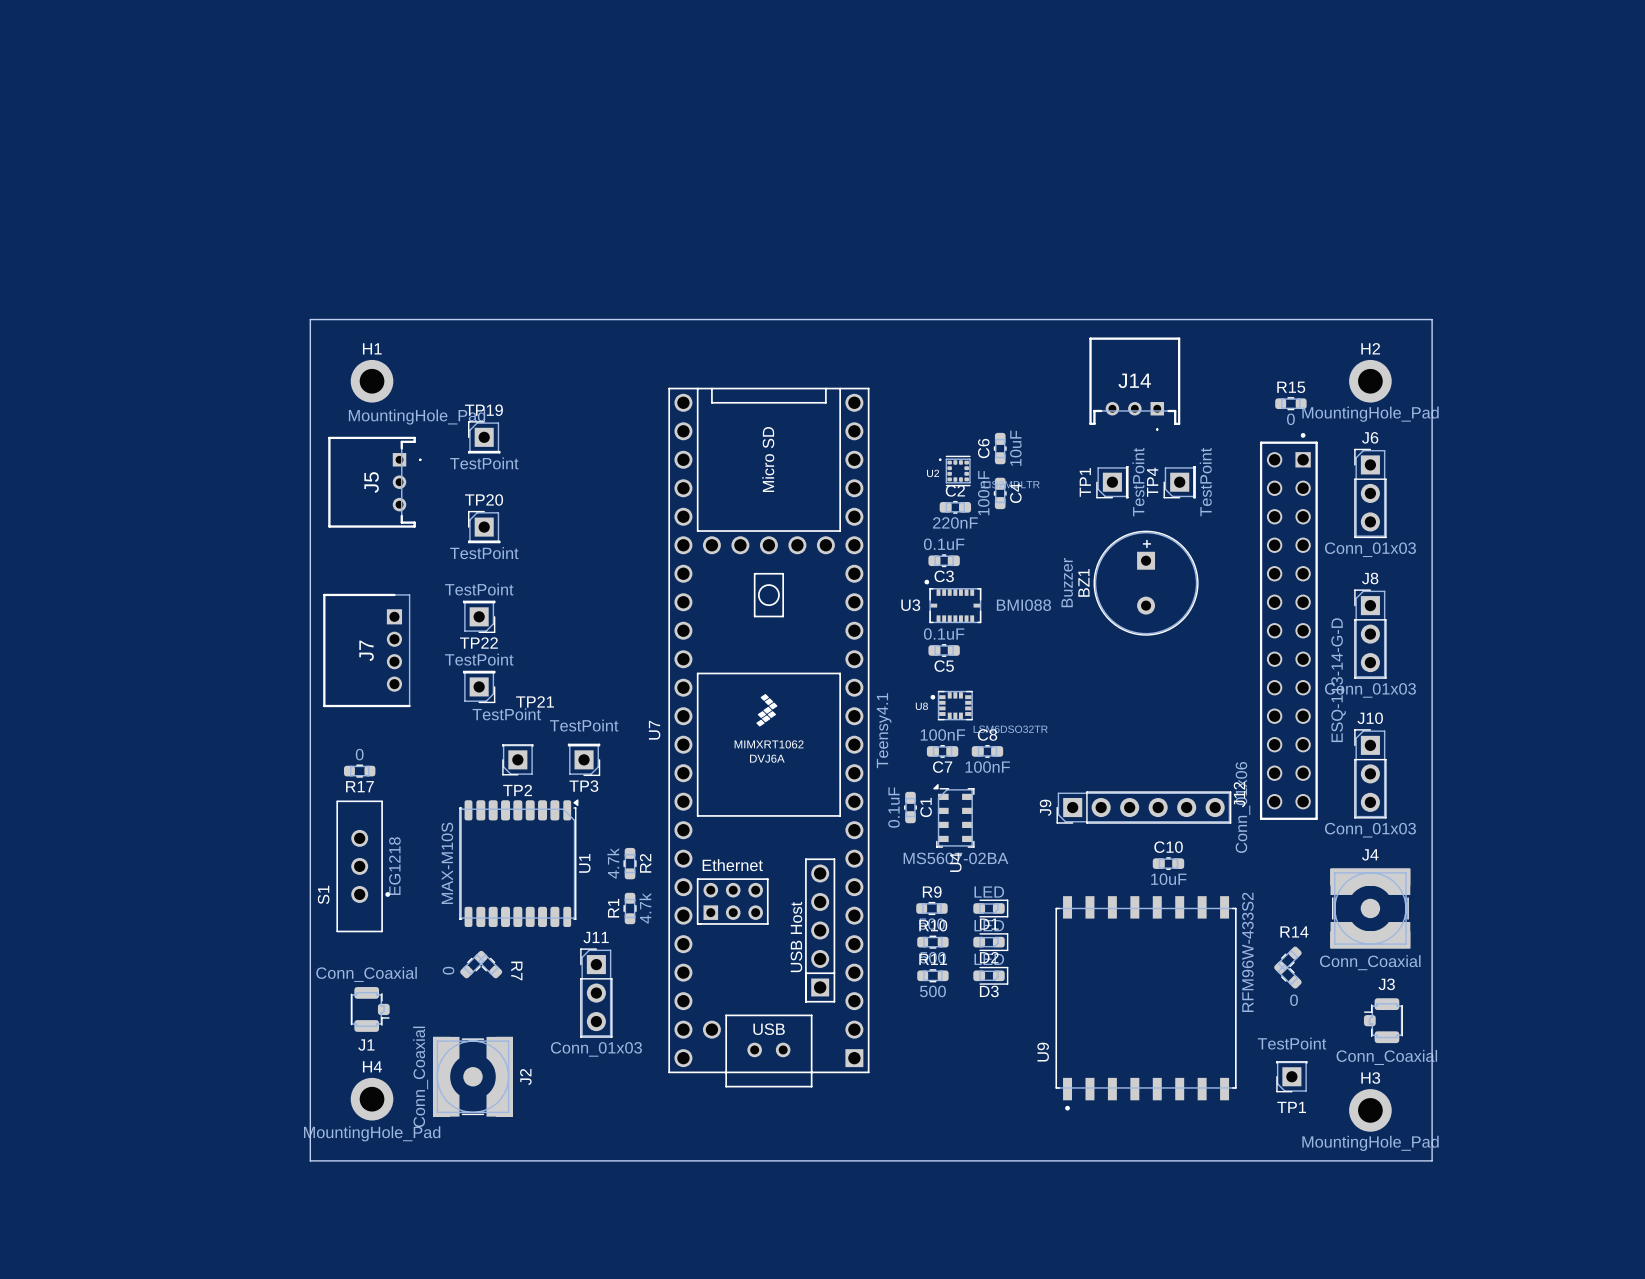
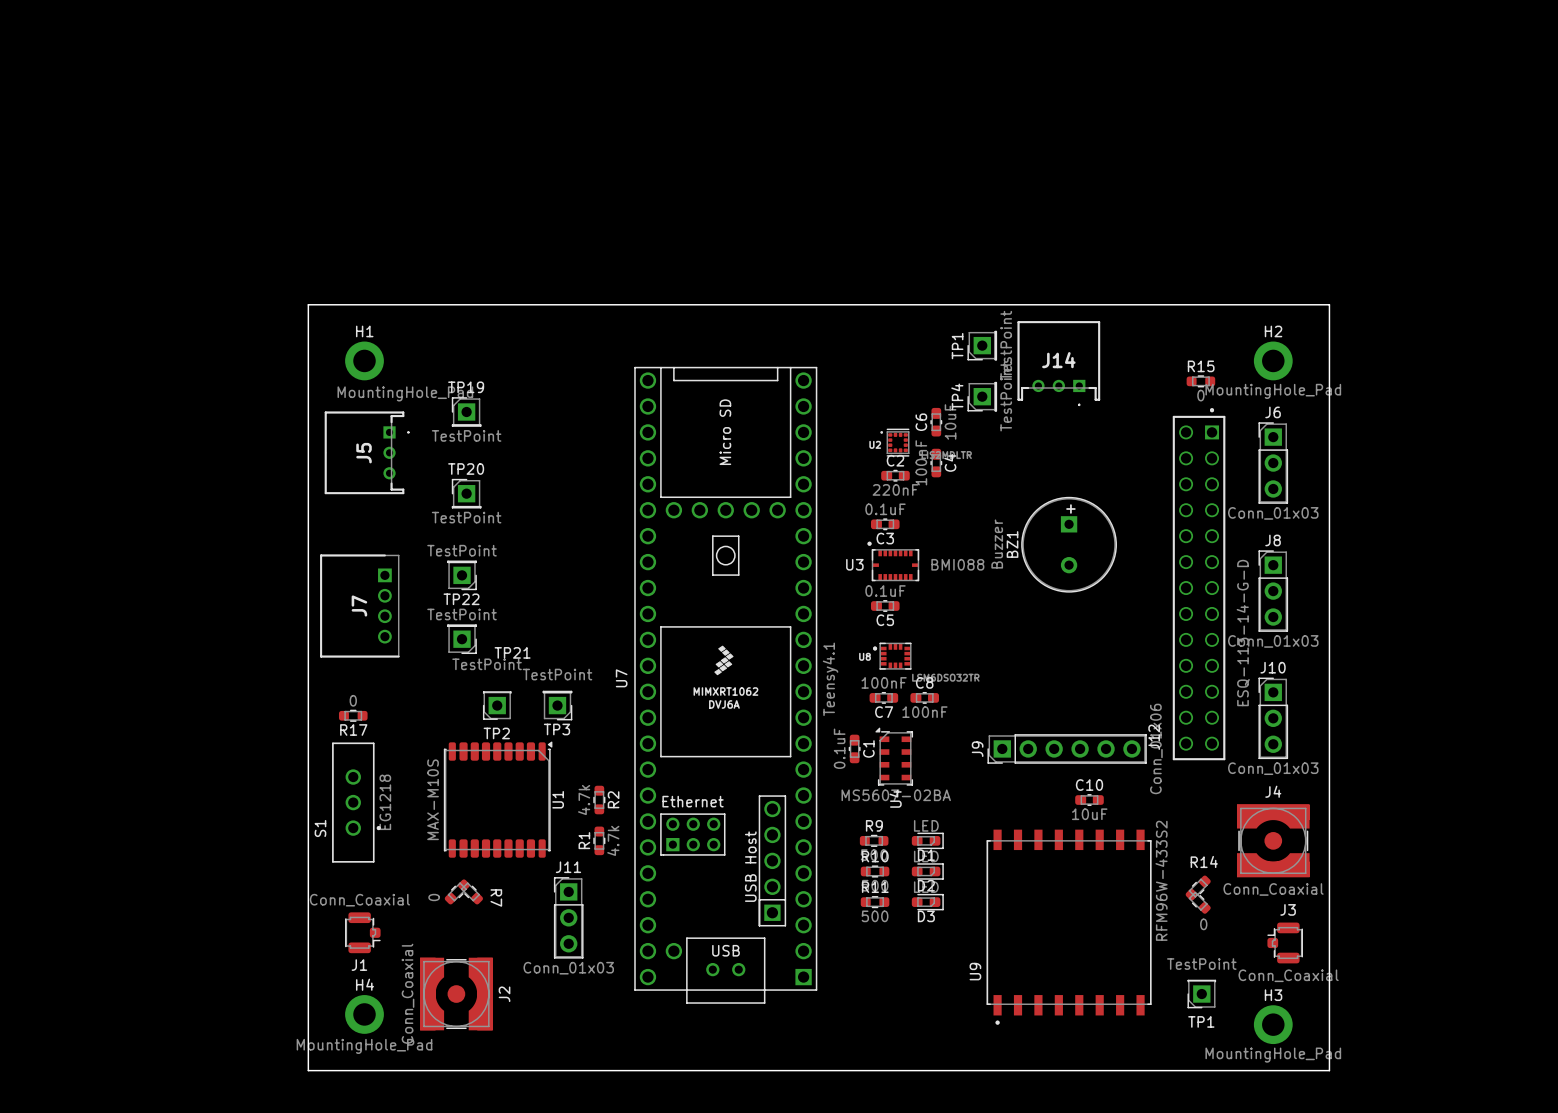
TP1 position: (1112, 482) -> (982, 345)
TP4 position: (1179, 482) -> (982, 396)

